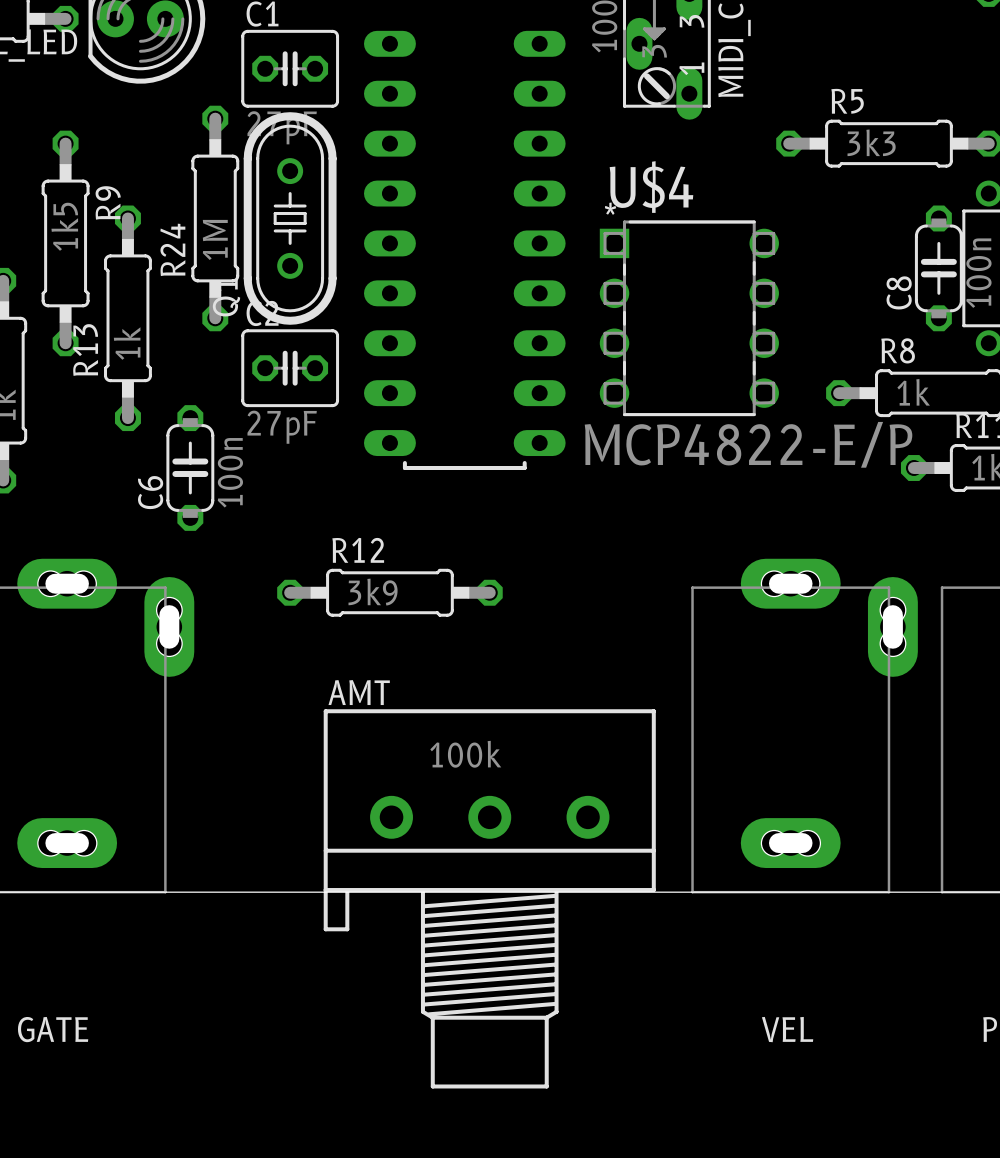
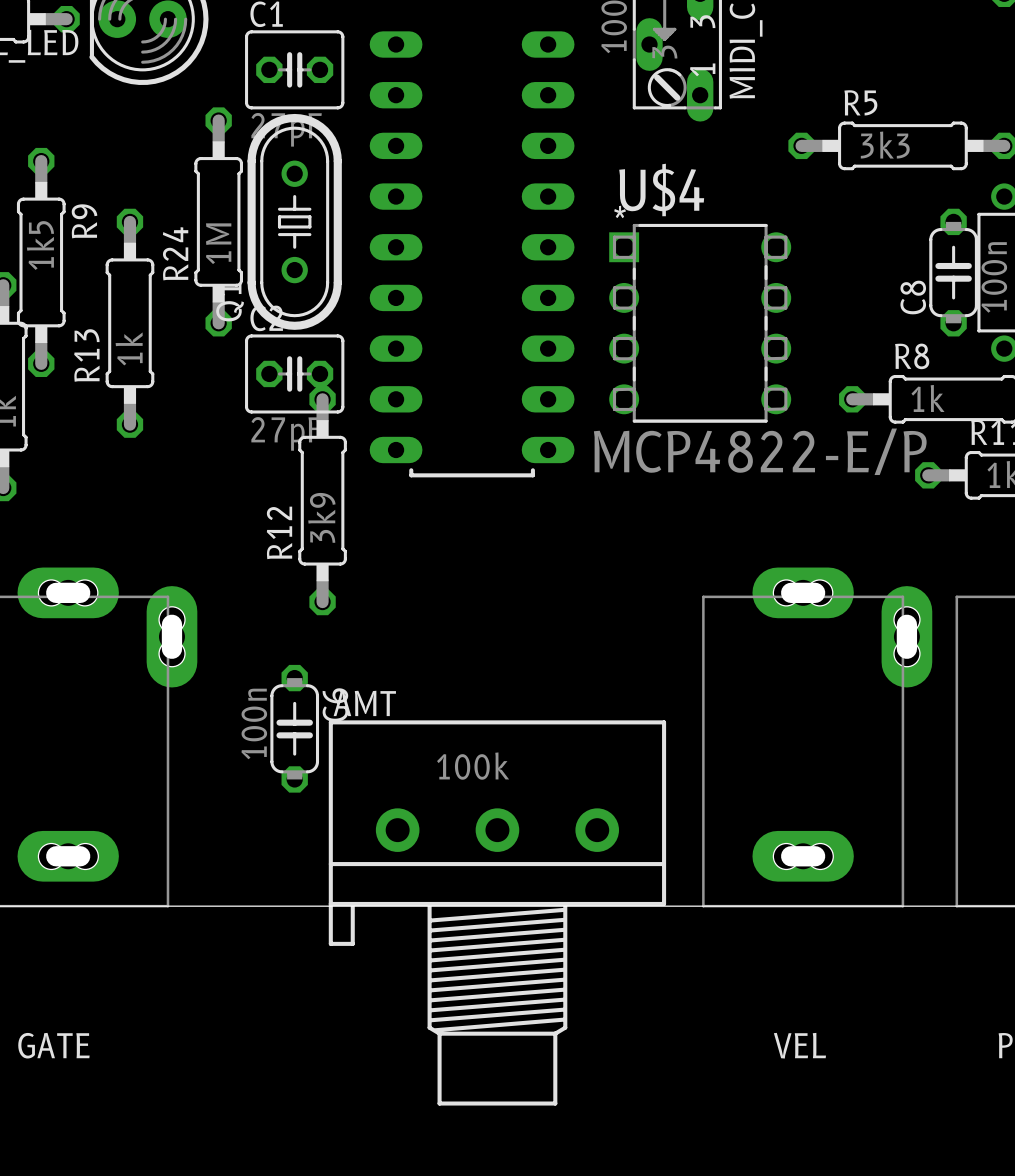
R9 position: (65, 243) -> (41, 262)
C6 rotation: 0° (190, 468) -> 180° (294, 728)
C6 position: (190, 468) -> (294, 728)
R12 name position: R12 (358, 550) -> R12 (279, 532)
R12 rotation: 0° (389, 592) -> 90° clockwise (322, 500)

